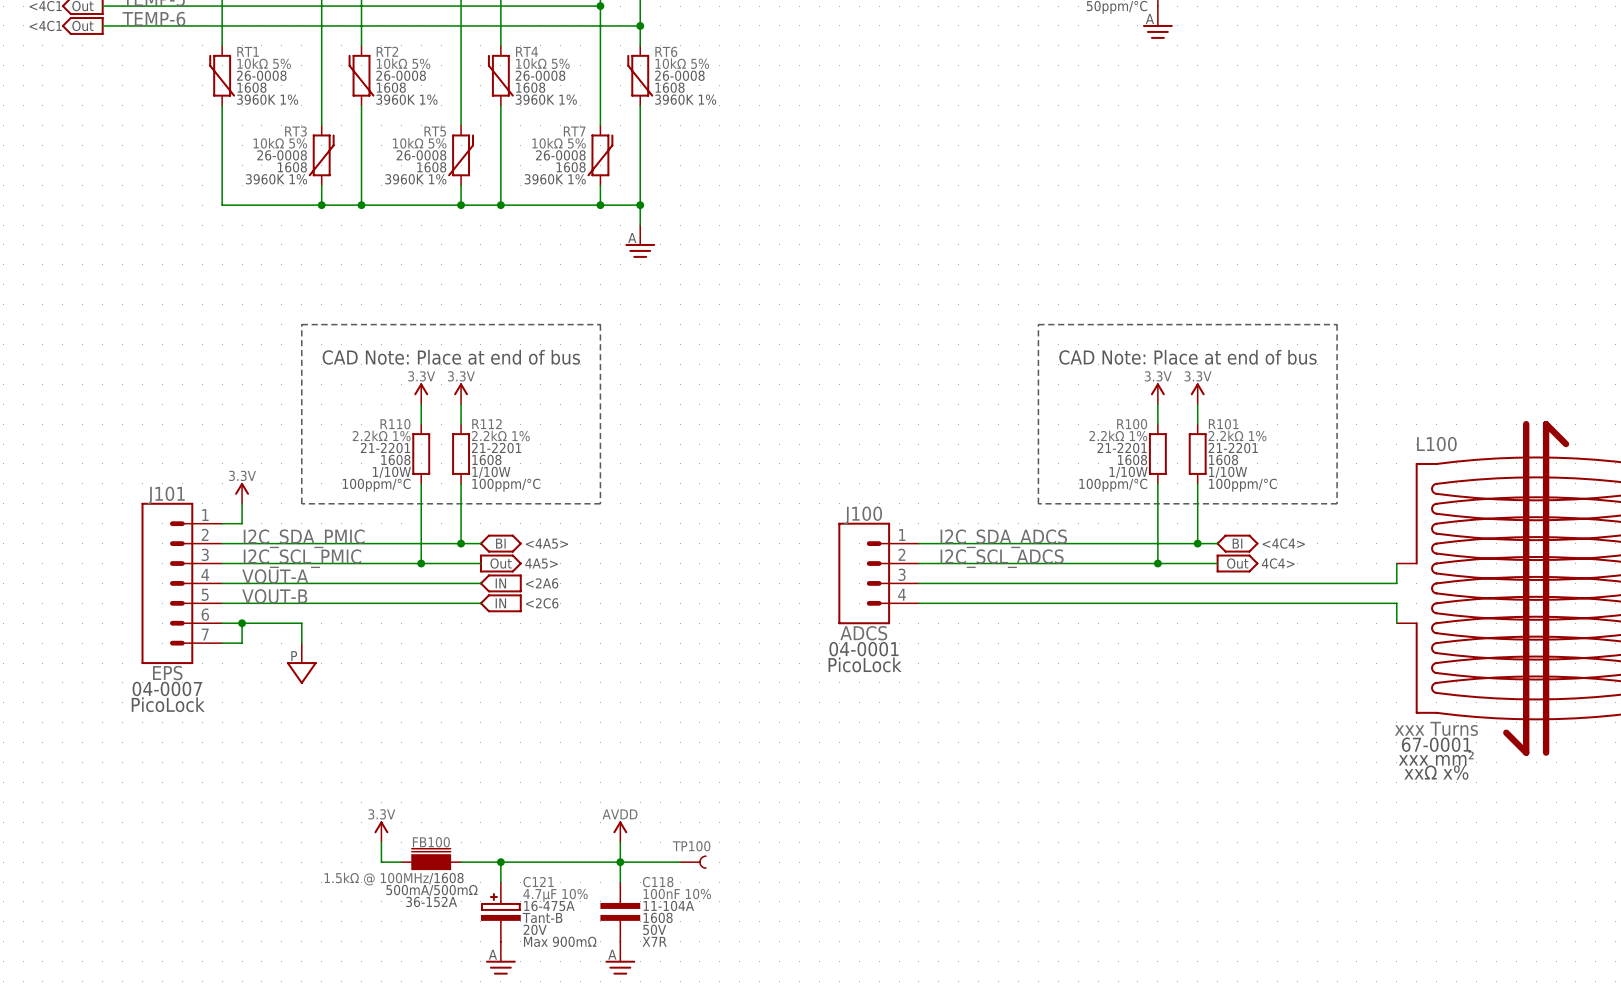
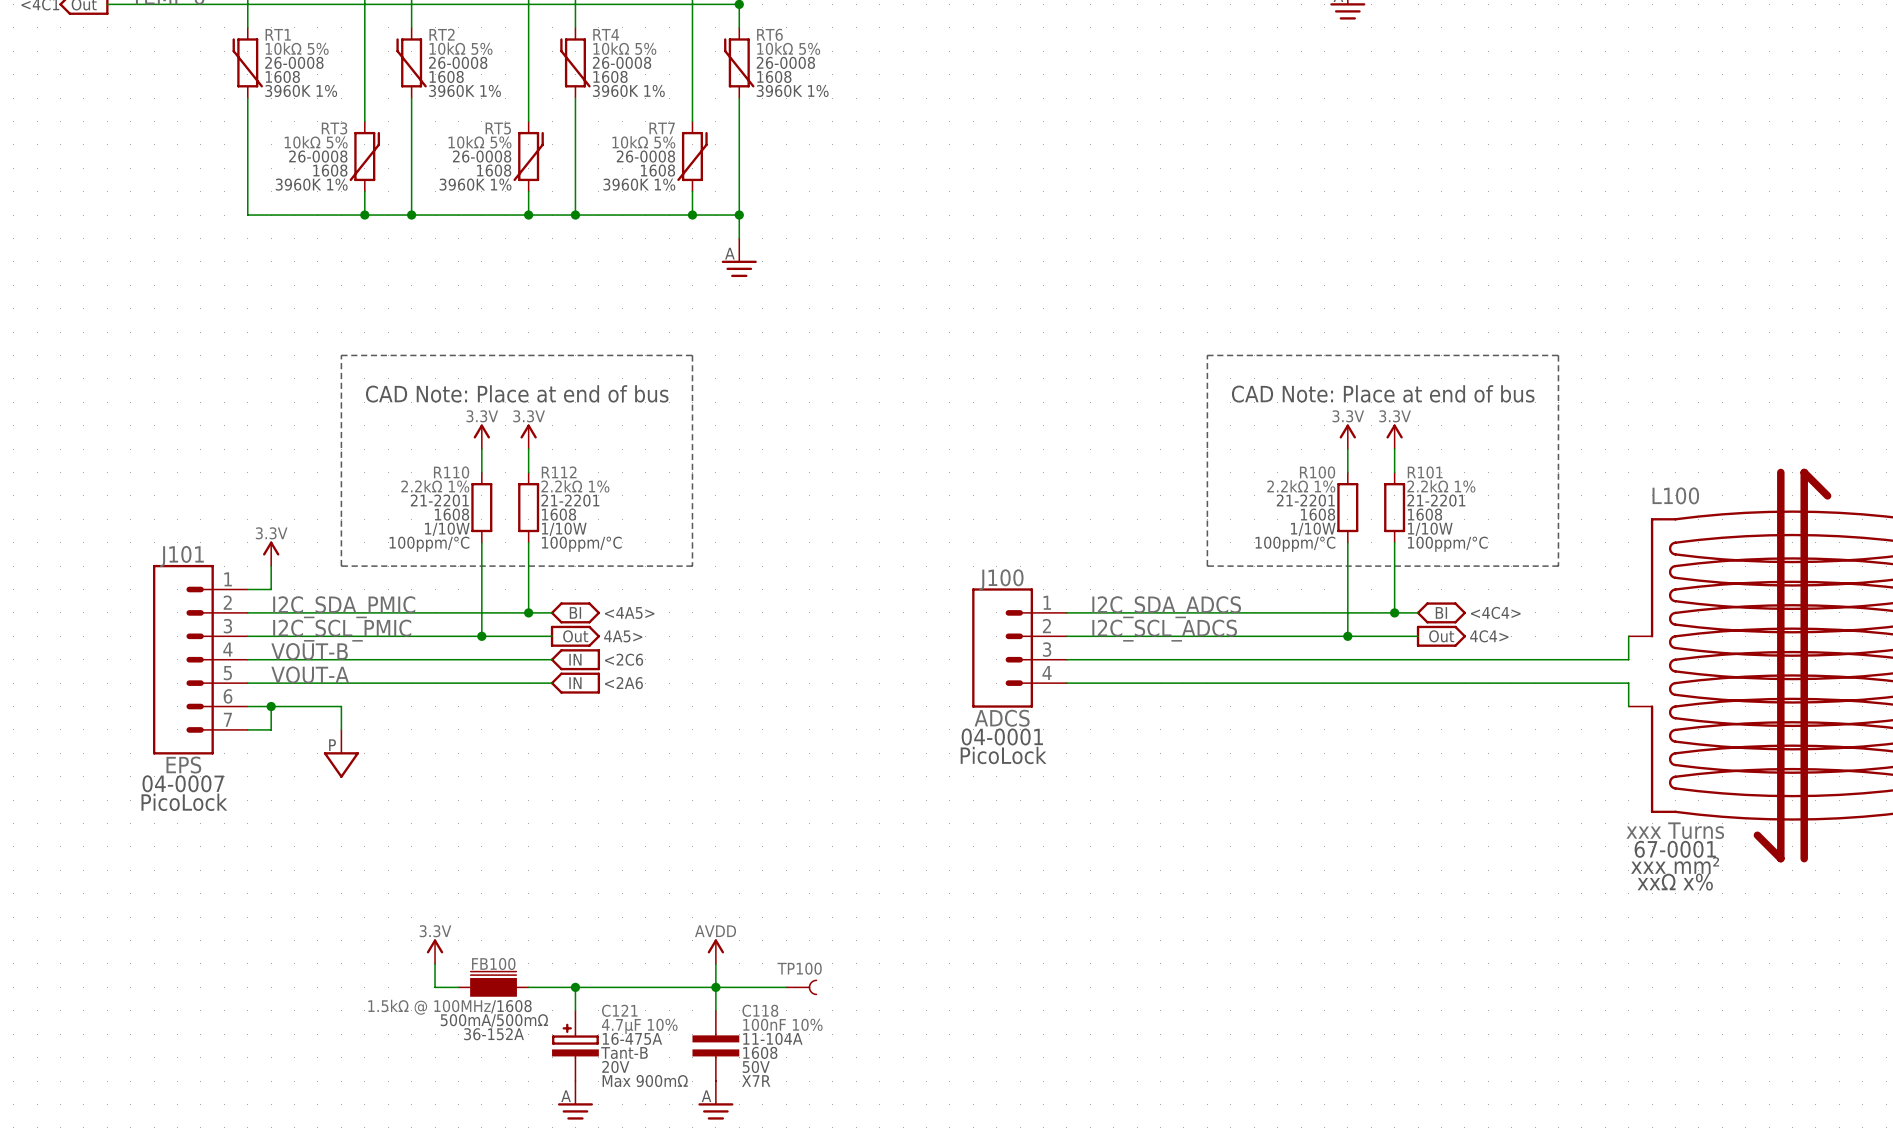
label: VOUT-A (275, 576) -> VOUT-B (309, 651)
text: <2A6 (542, 583) -> <2C6 (624, 659)
label: VOUT-B (274, 596) -> VOUT-A (310, 674)
text: <2C6 (542, 603) -> <2A6 (623, 683)

